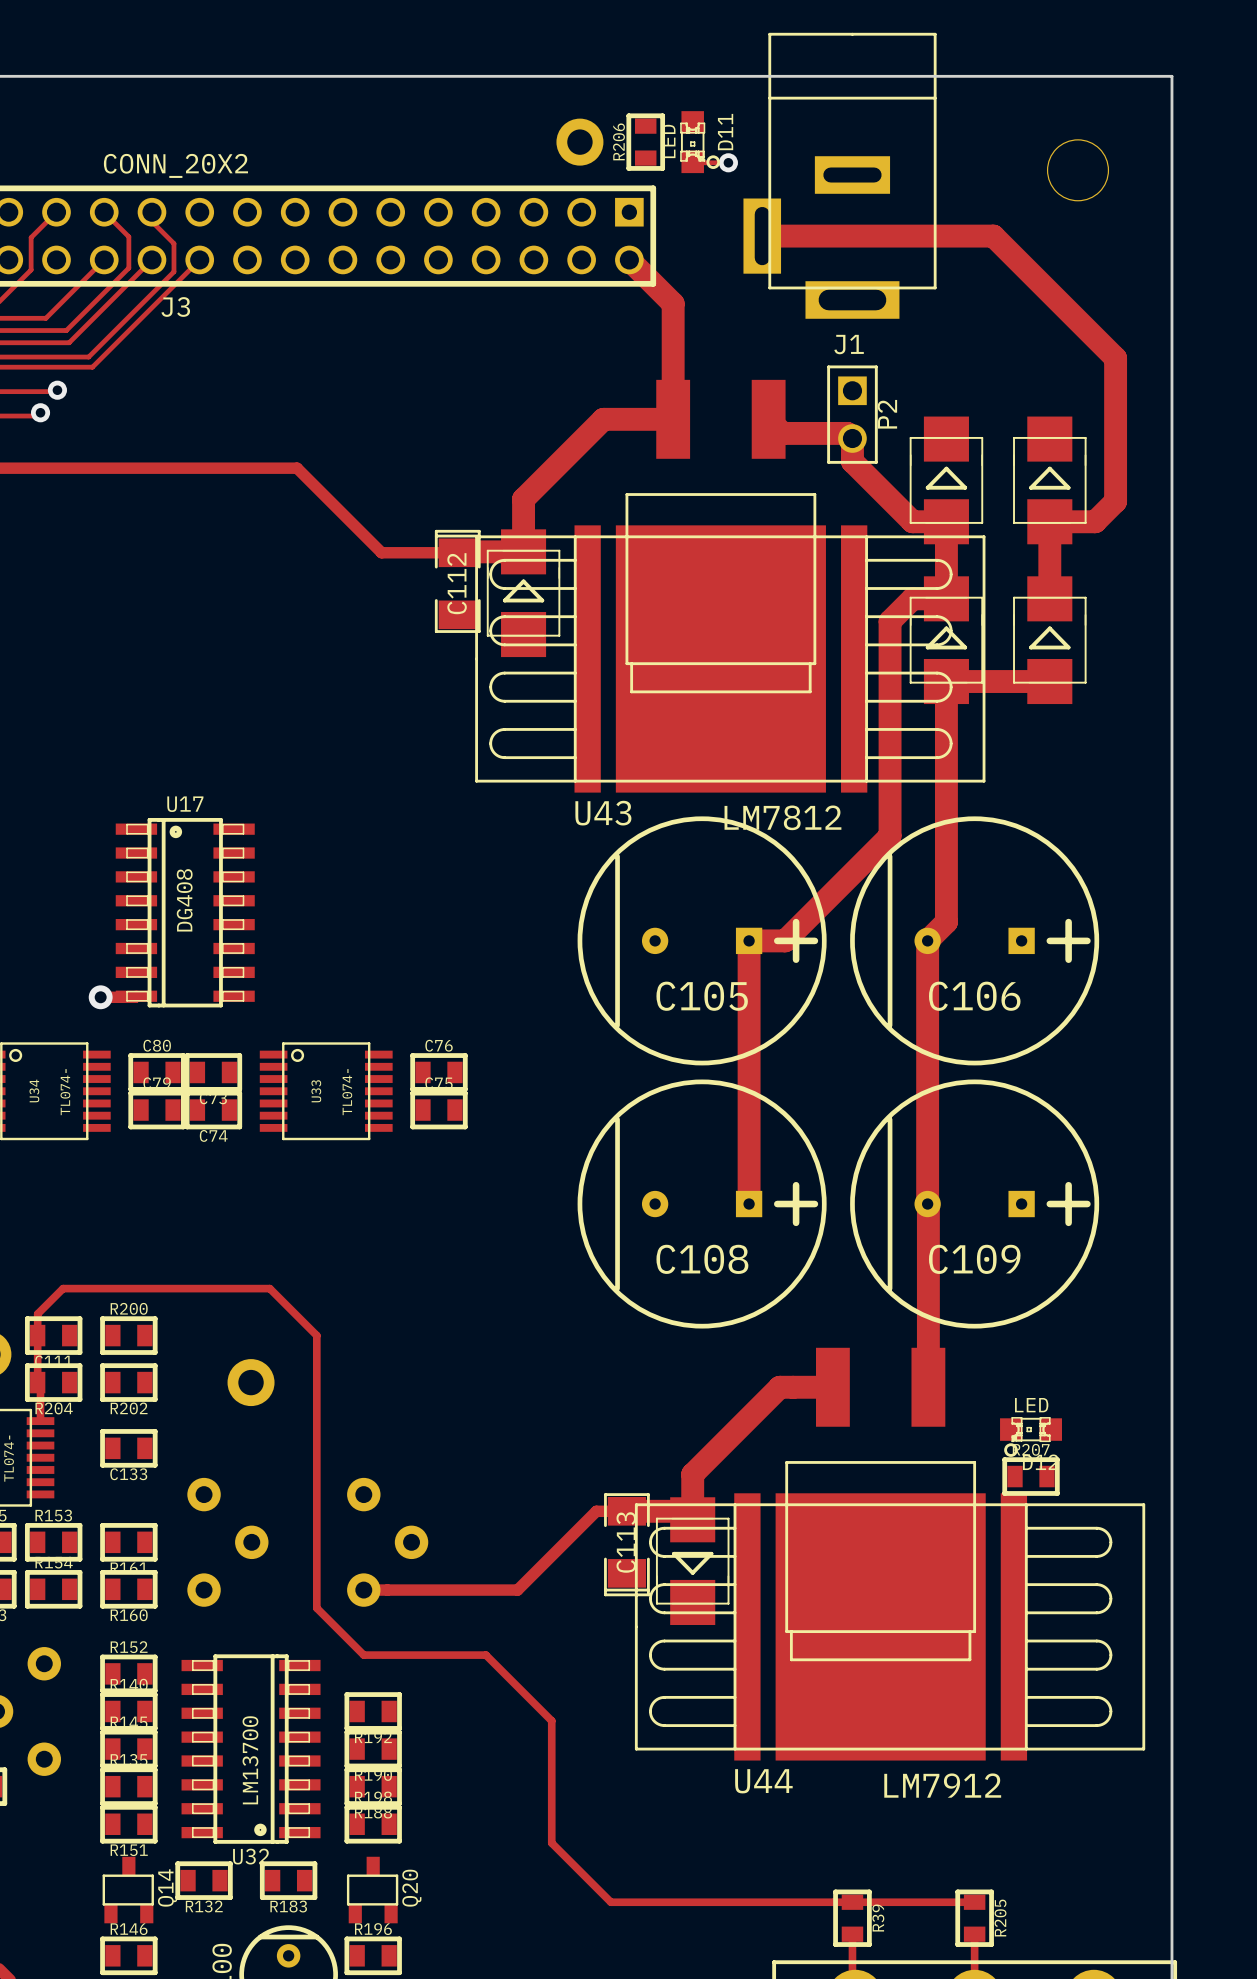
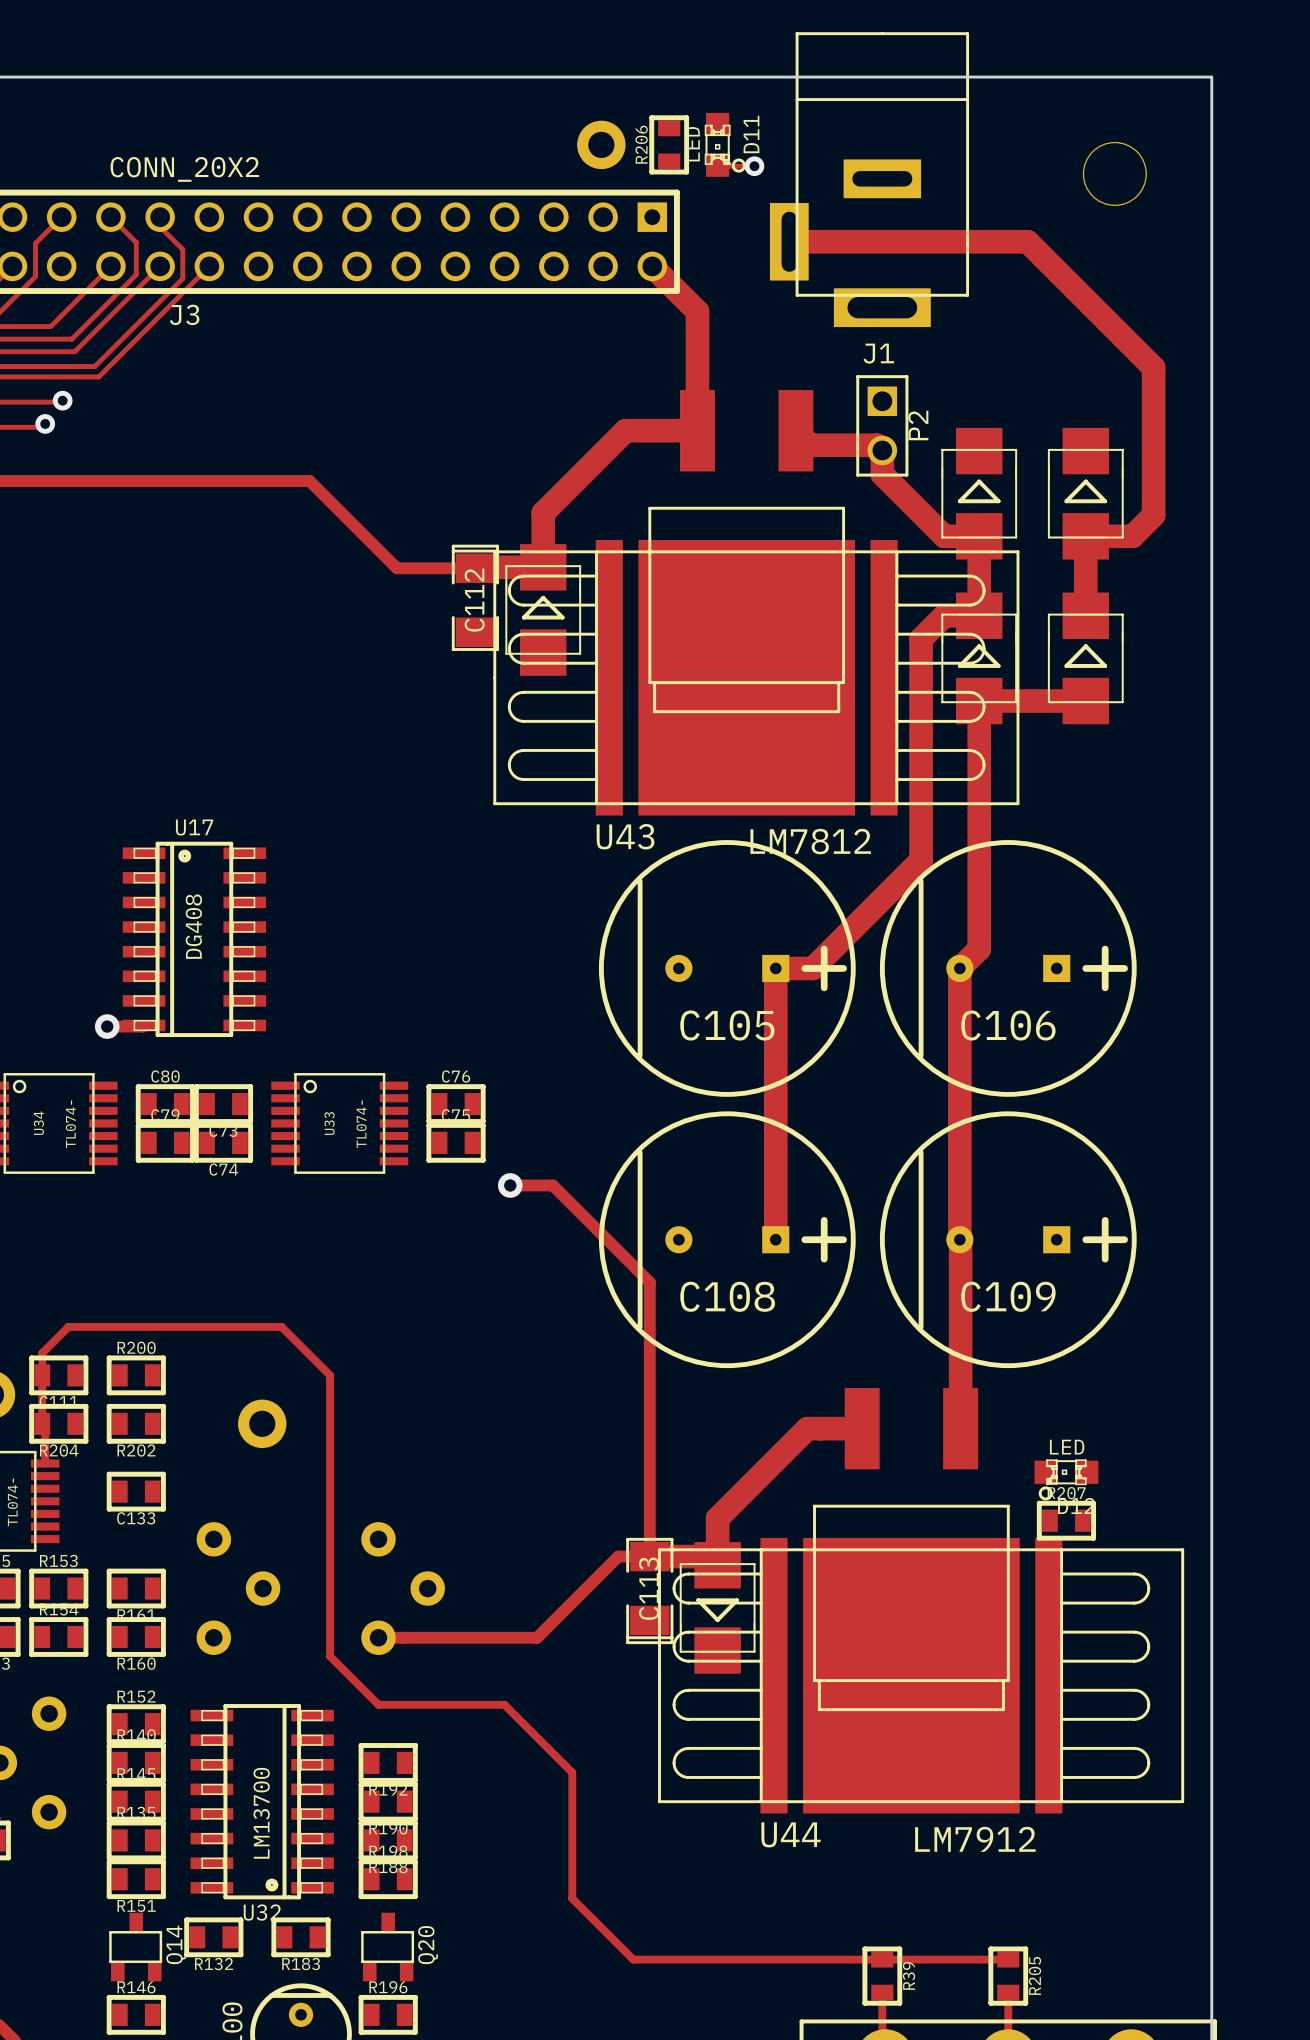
track: none -> (510, 1185) (552, 1185) (649, 1282) (649, 1556)
via: none -> (510, 1185)

